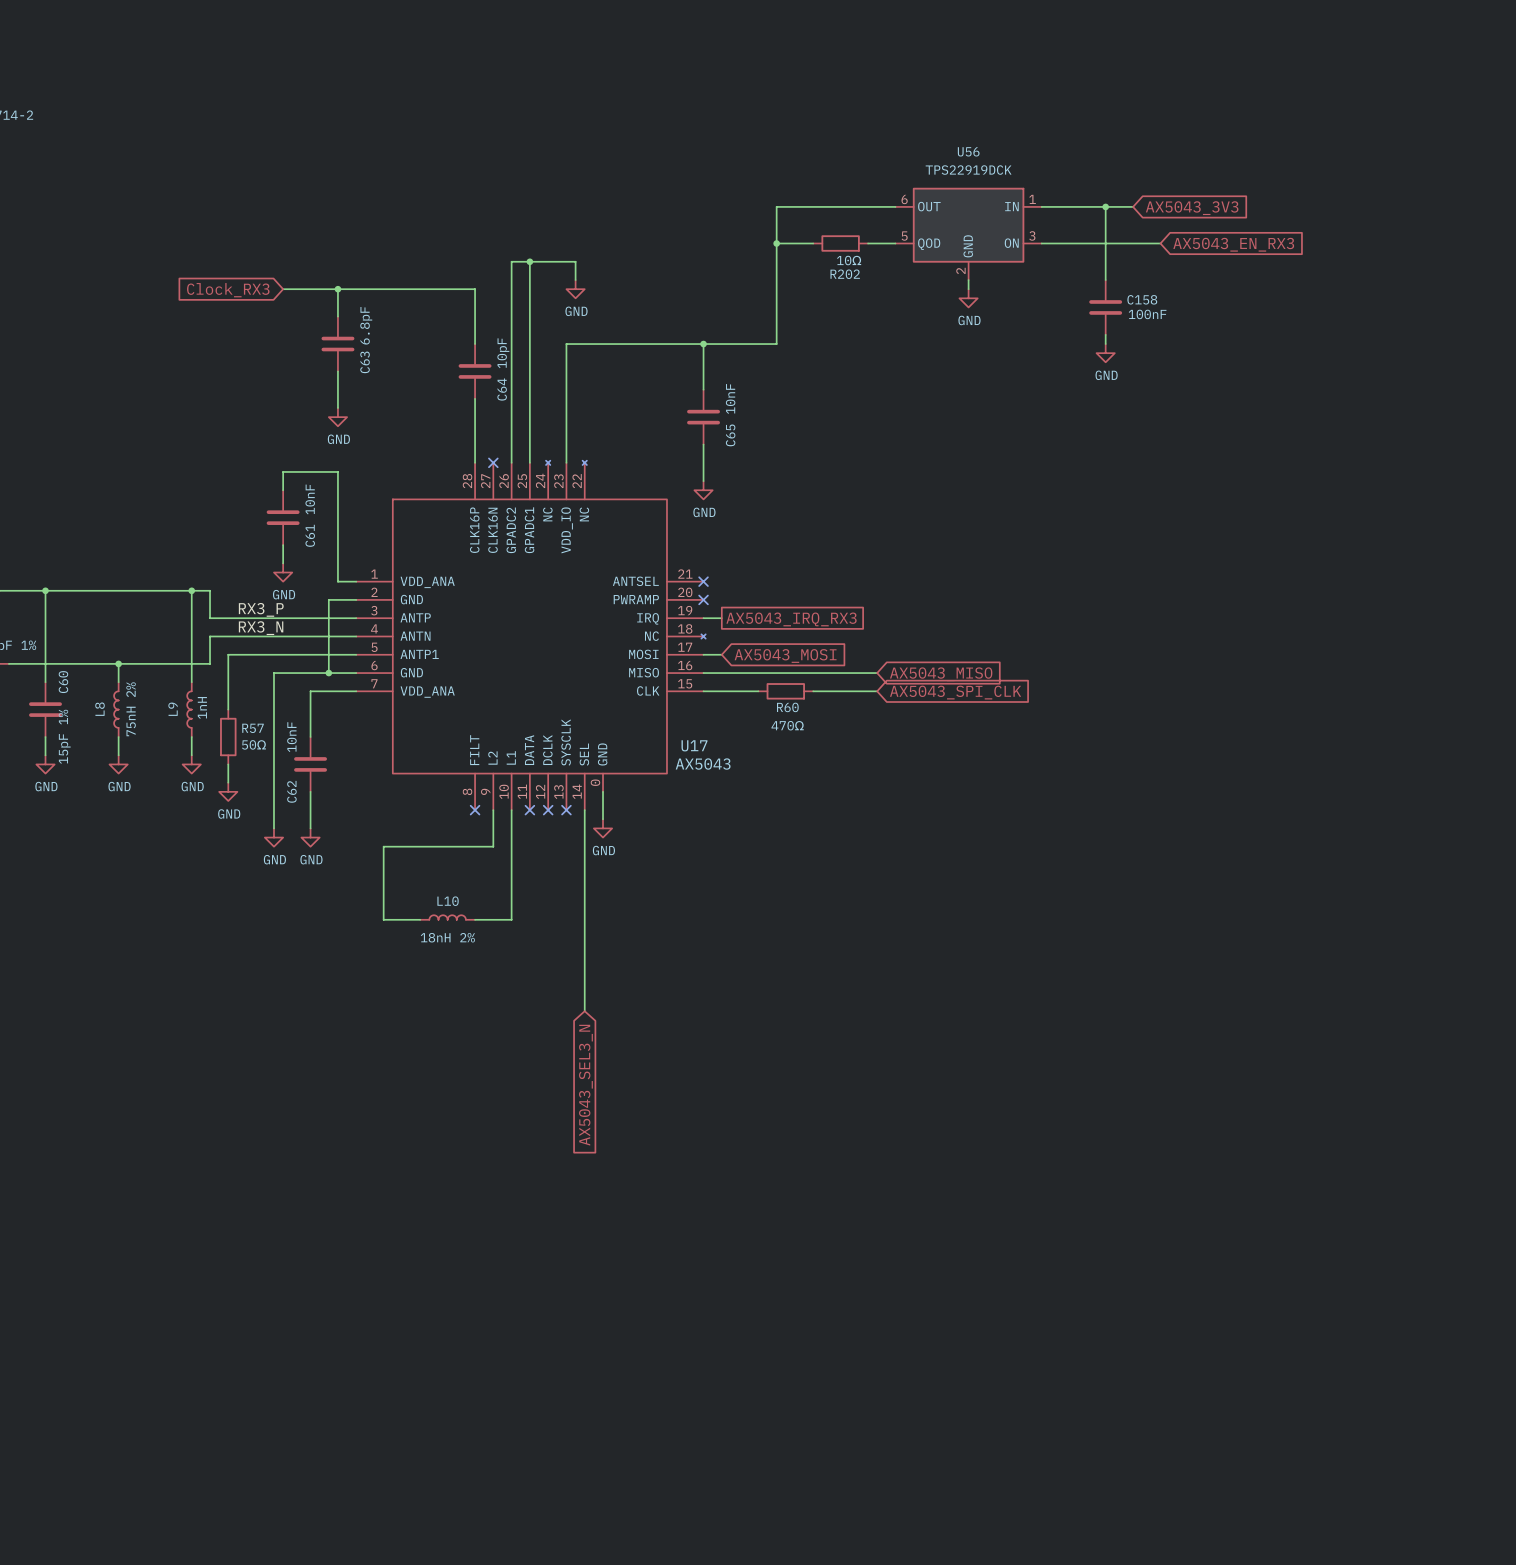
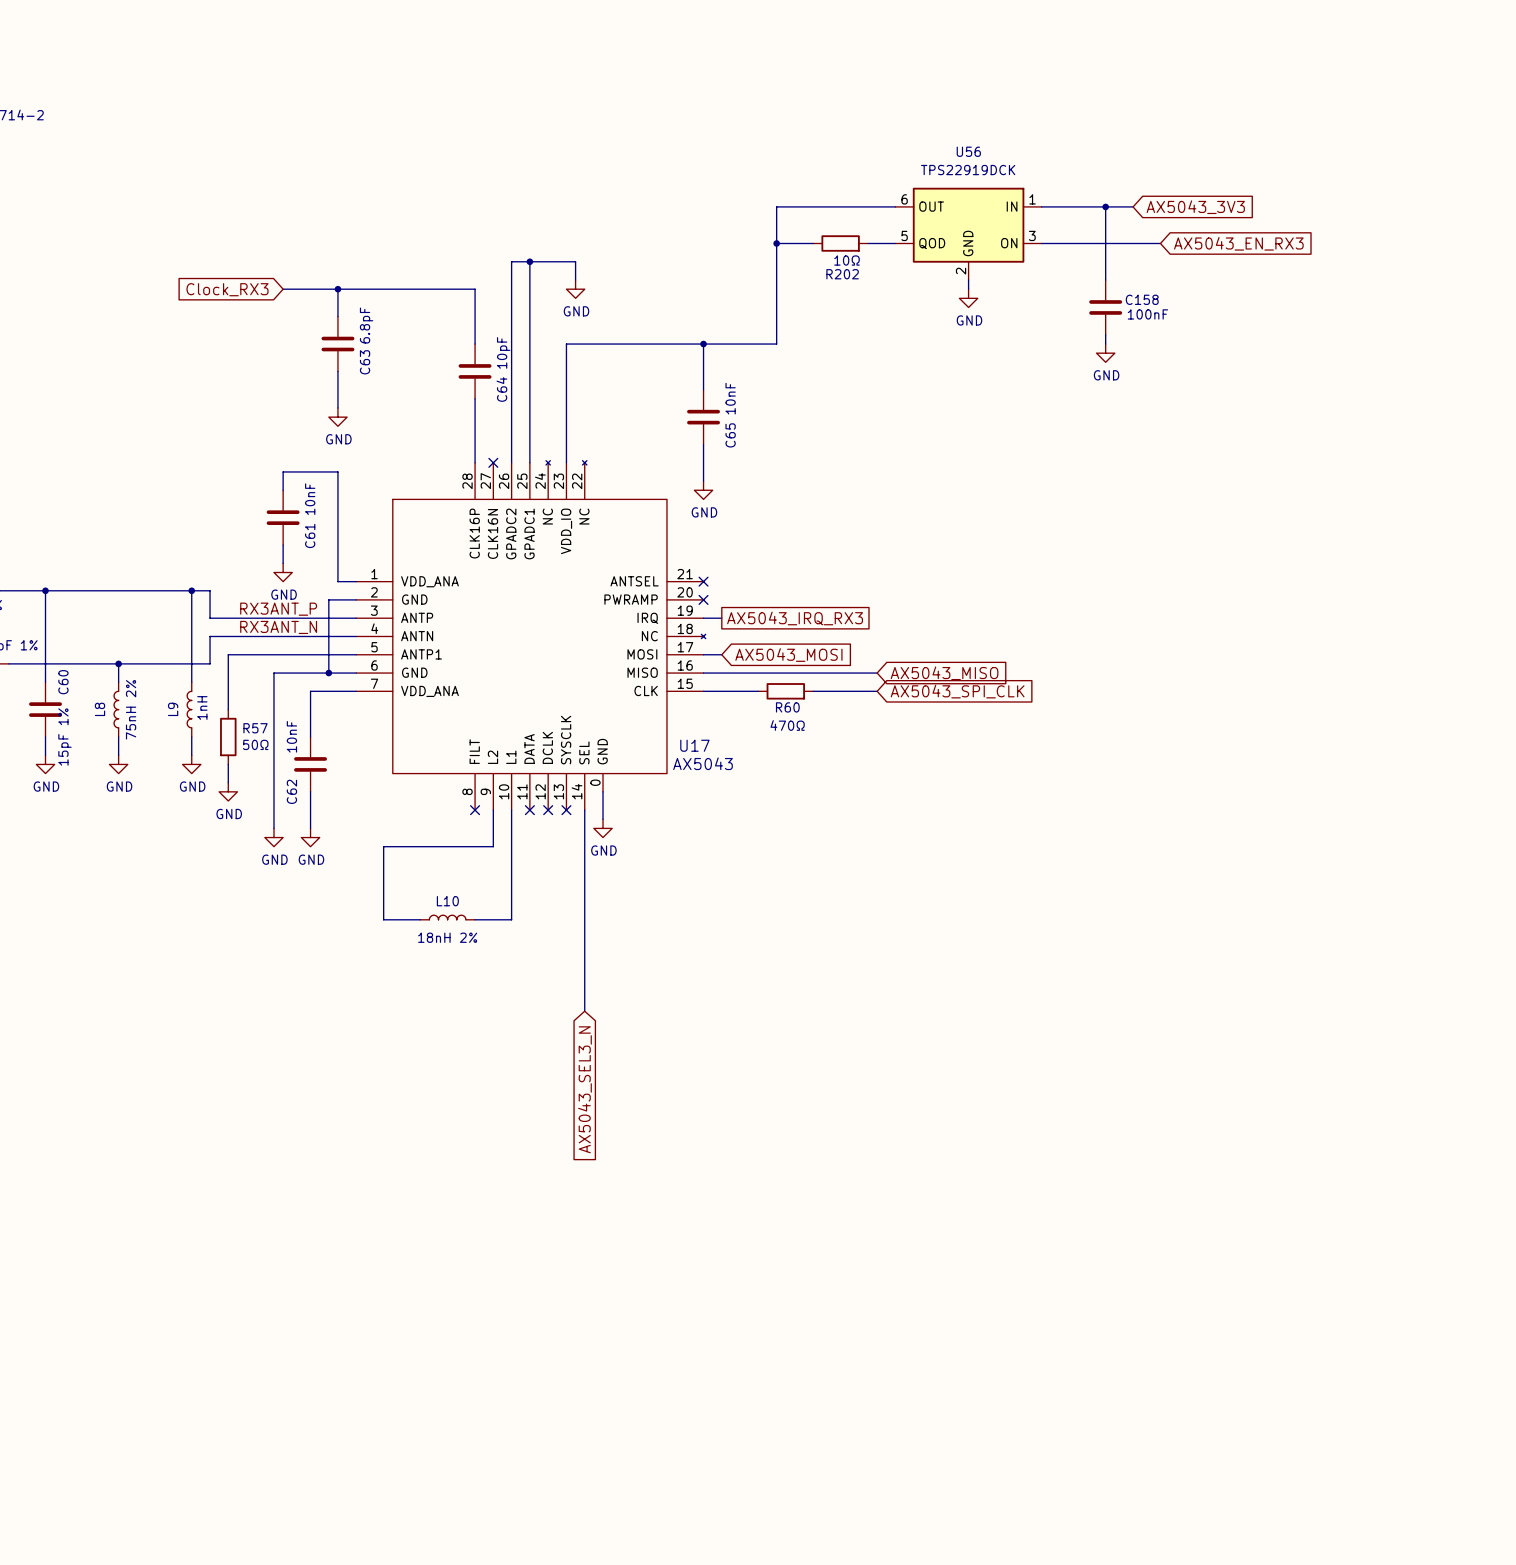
label: RX3_P (261, 609) -> RX3ANT_P (278, 609)
label: RX3_N (261, 628) -> RX3ANT_N (278, 627)

